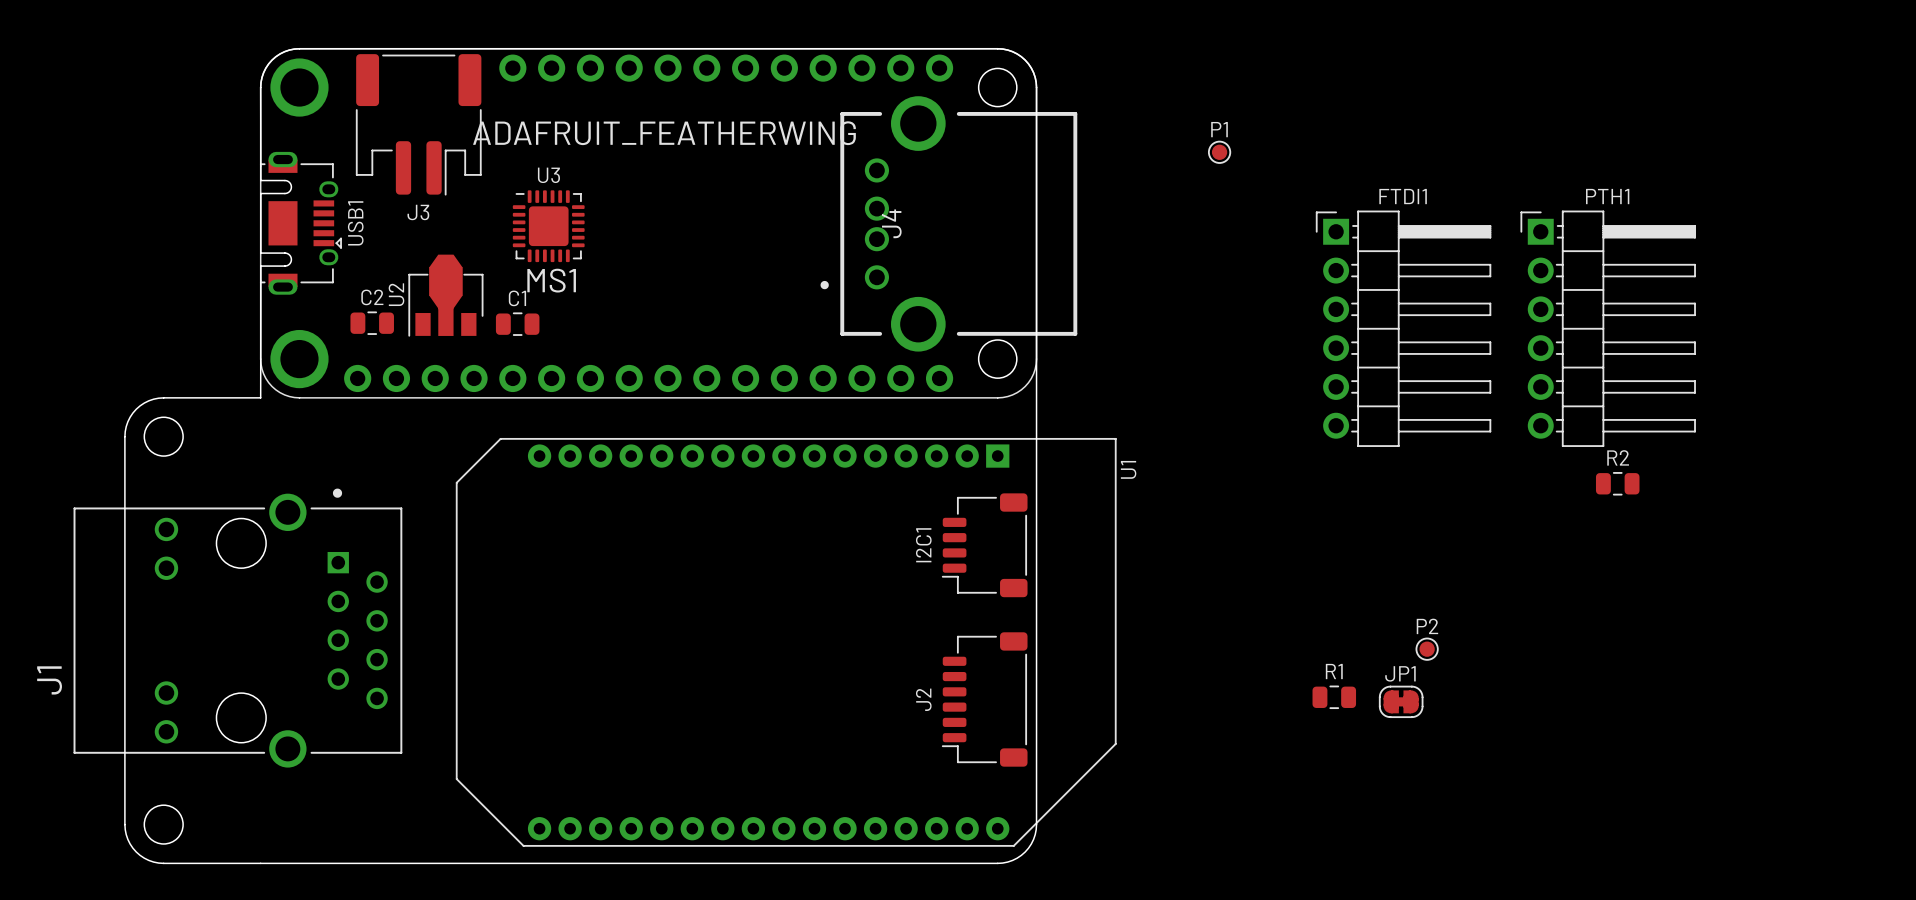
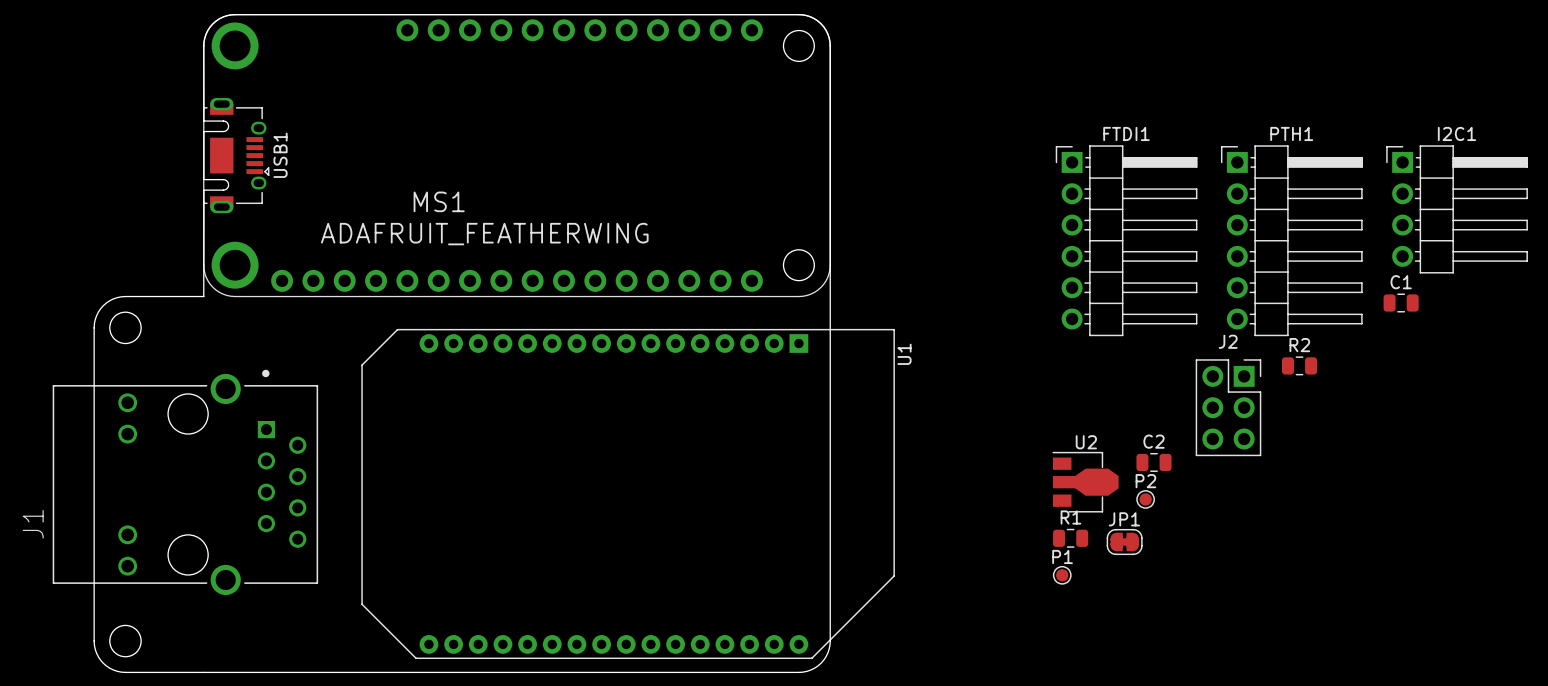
J3: (418, 124) -> none
MS1 value position: ADAFRUIT_FEATHERWING (664, 133) -> ADAFRUIT_FEATHERWING (484, 234)
P1 position: (1219, 152) -> (1062, 575)
J4: (948, 223) -> none
U3: (548, 226) -> none
U2 rotation: 0° (445, 295) -> 90° clockwise (1085, 482)
U2 position: (445, 295) -> (1085, 482)
C2 position: (372, 323) -> (1154, 462)
C1 position: (517, 324) -> (1401, 303)
I2C1 footprint: [941, 493, 1028, 598] -> [1386, 145, 1528, 274]
I2C1 name position: I2C1 (923, 545) -> I2C1 (1456, 133)
J2 footprint: [941, 632, 1028, 767] -> [1195, 359, 1262, 457]
J2 name position: J2 (923, 699) -> J2 (1228, 341)

